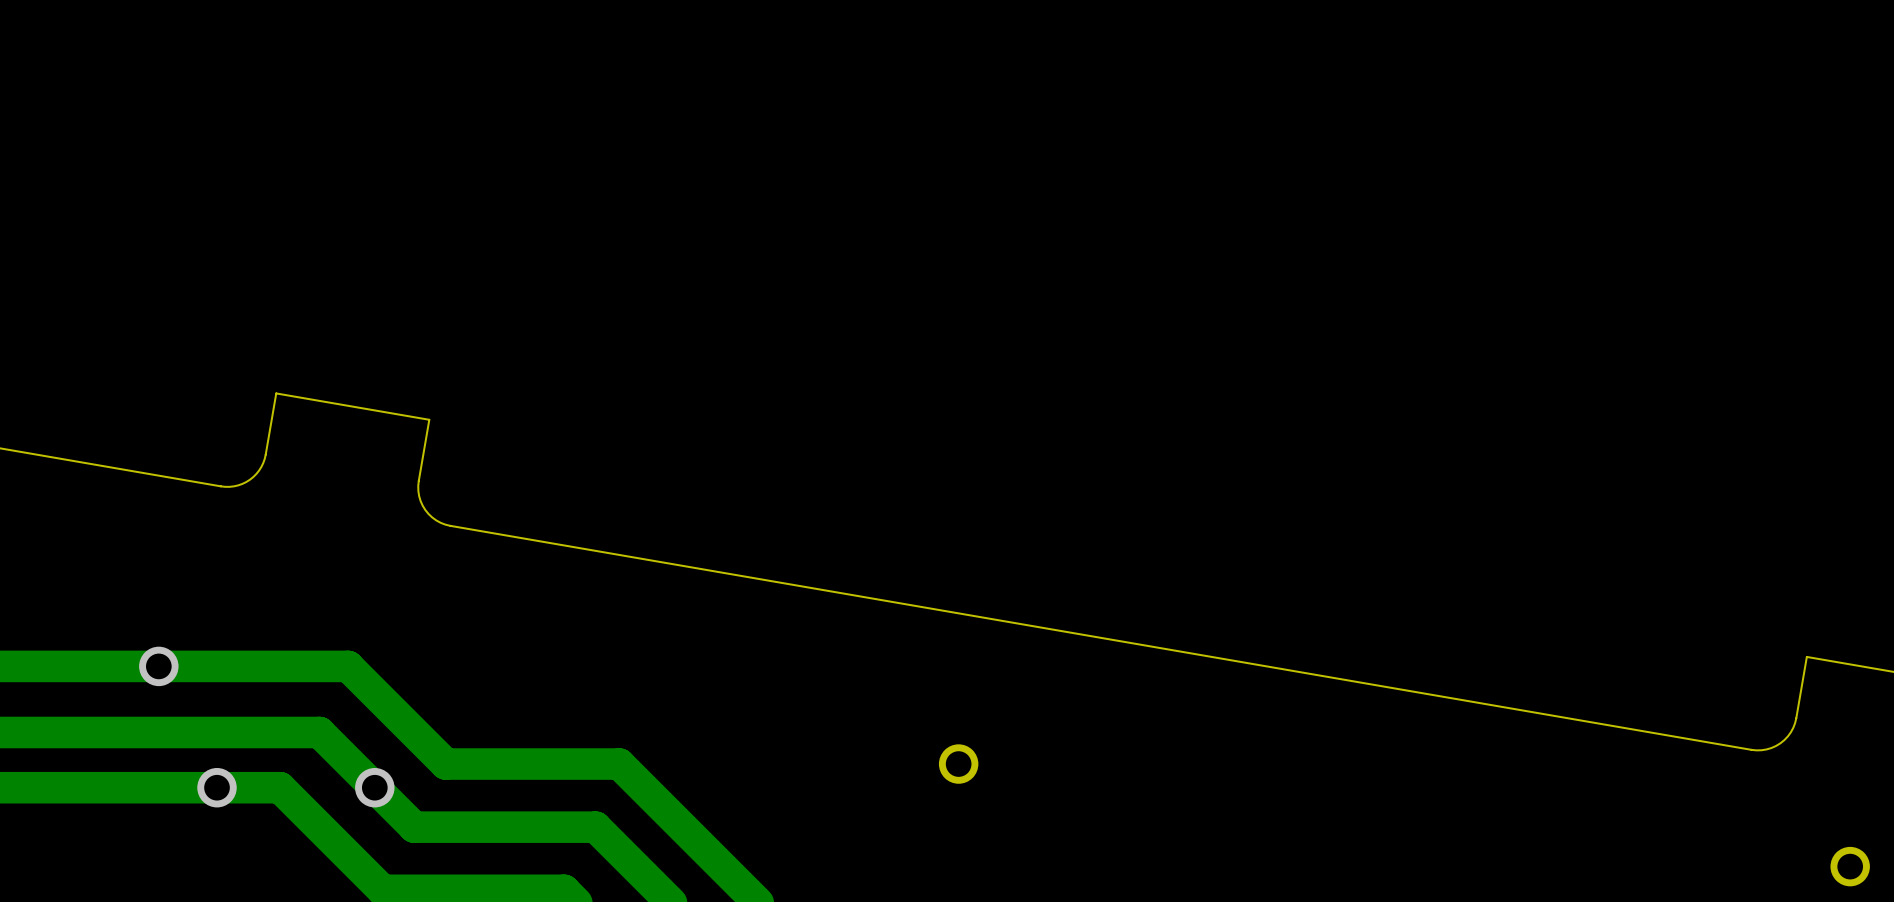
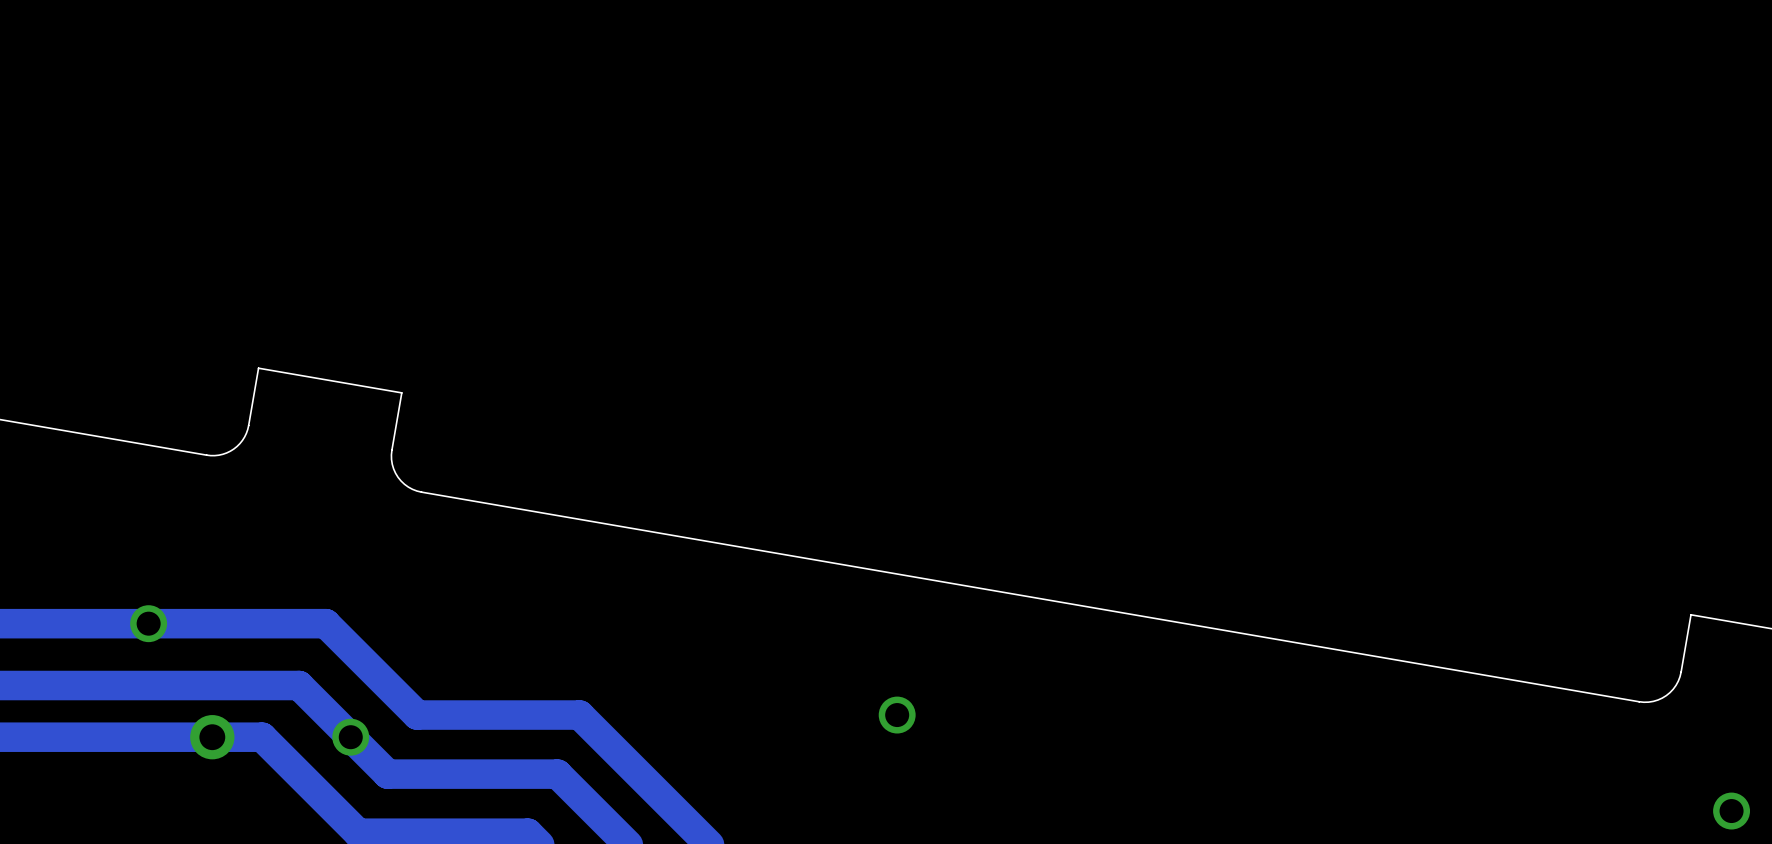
via size: [197, 767, 237, 808] -> [190, 715, 235, 760]

